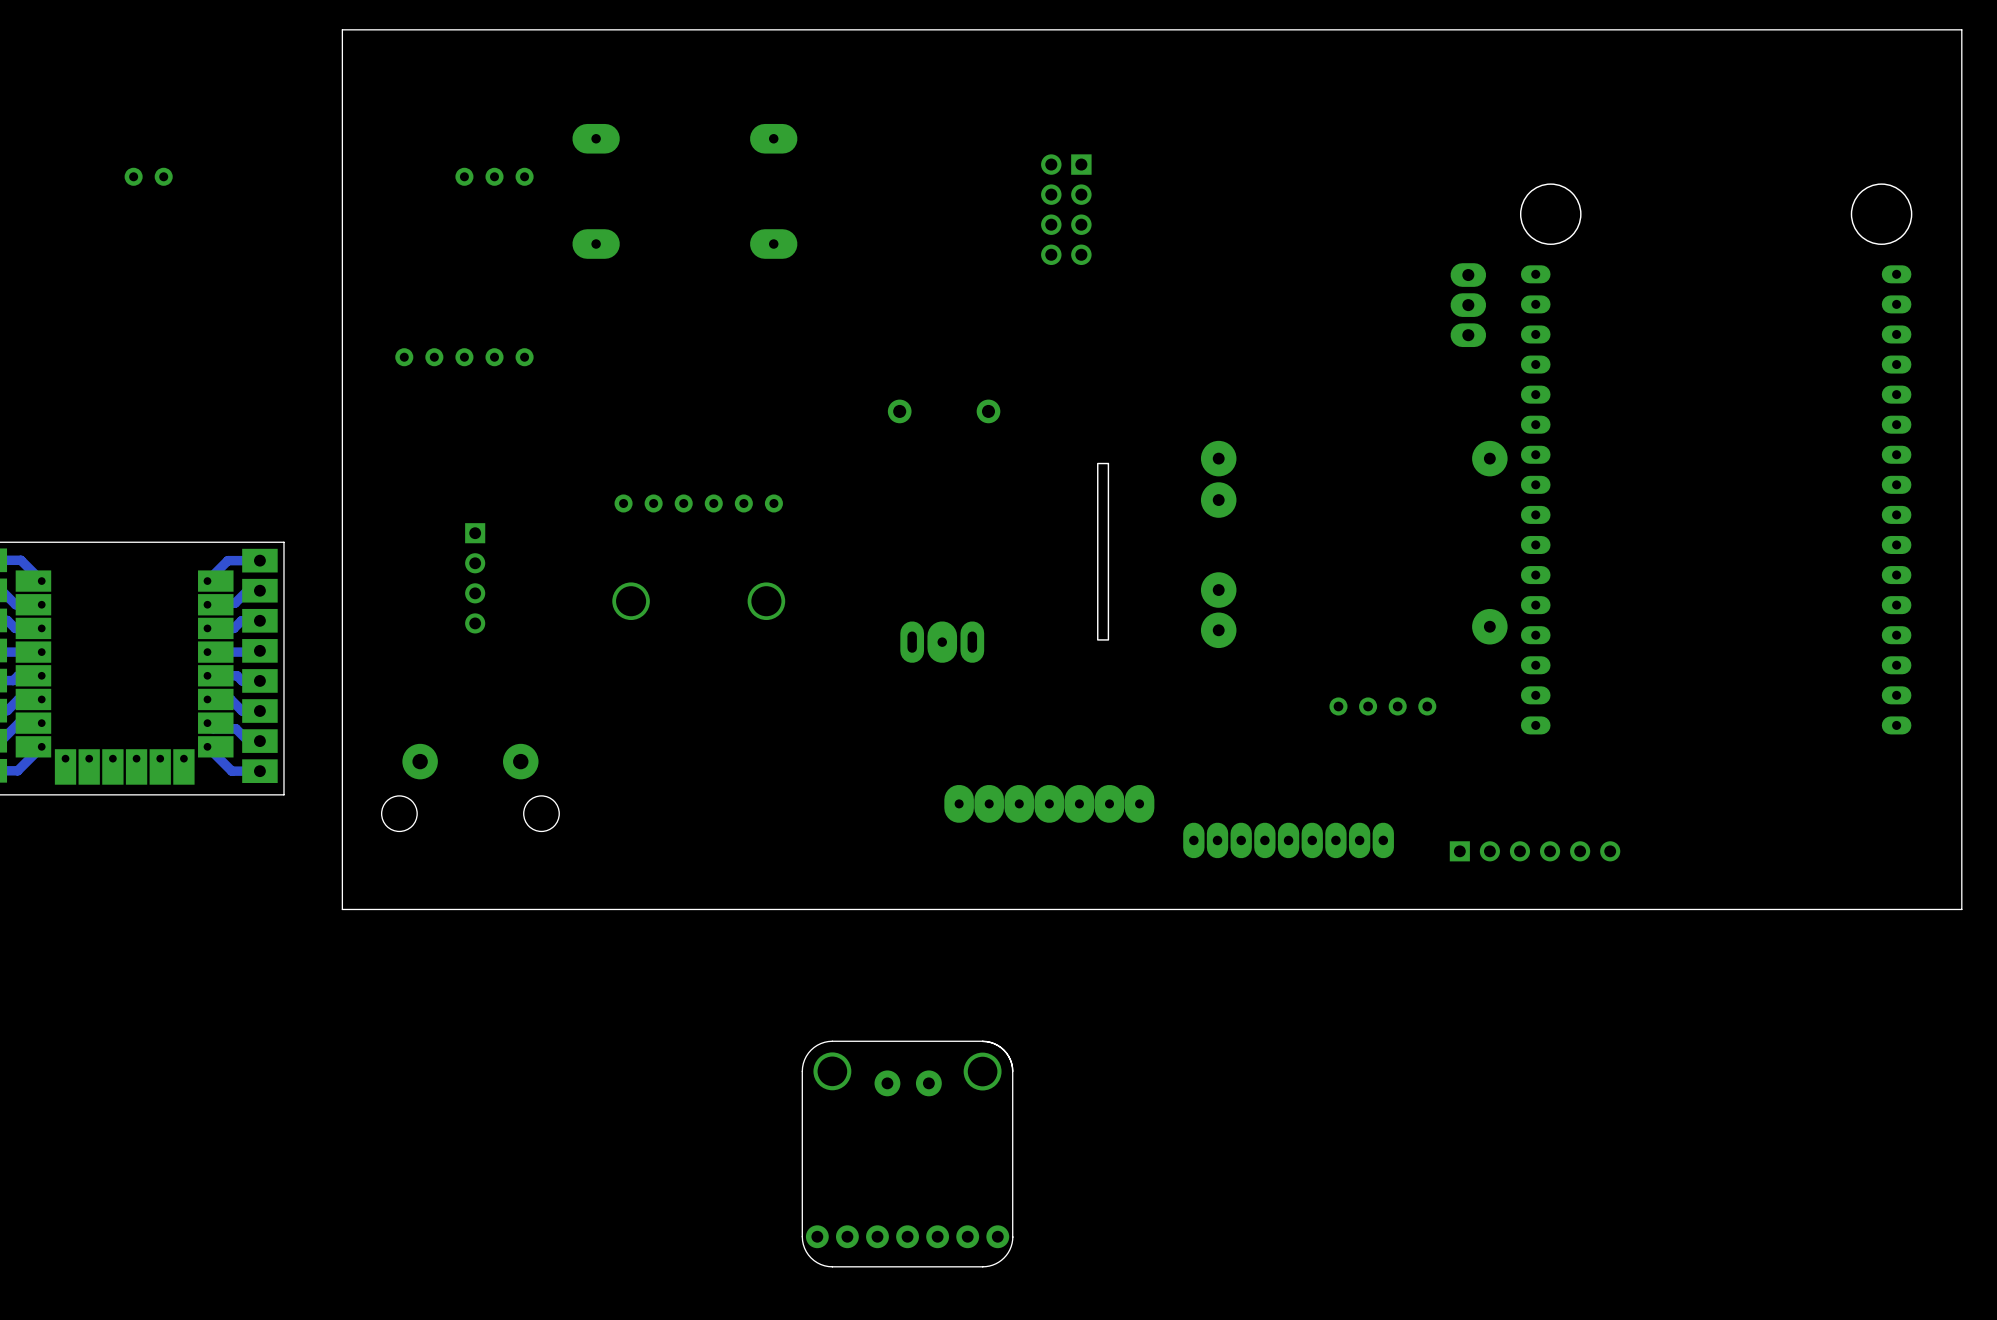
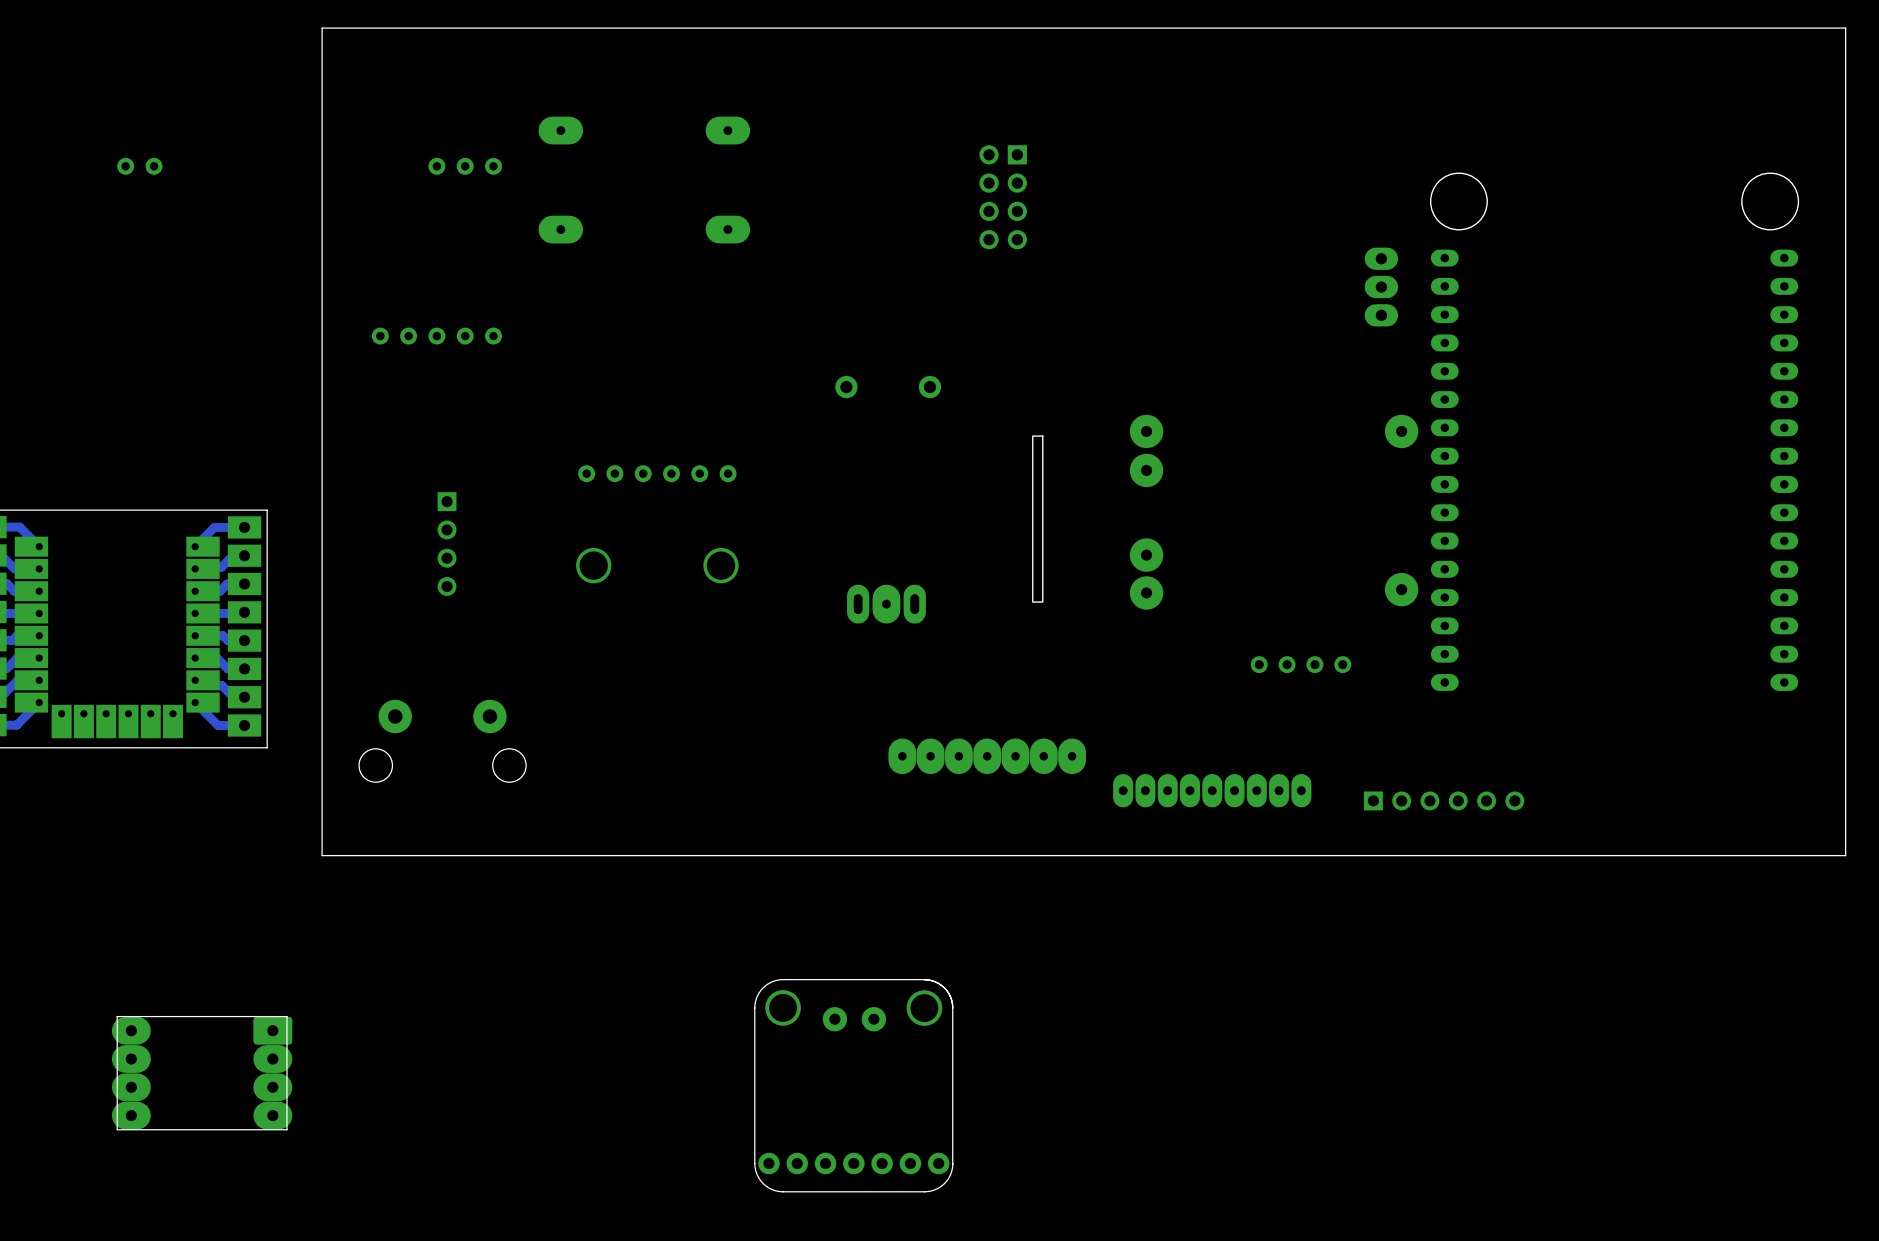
board edge: none -> (286, 1016) (117, 1016) (117, 1129) (286, 1129) (286, 1016)
part: none -> (131, 1073)
part: none -> (272, 1073)

